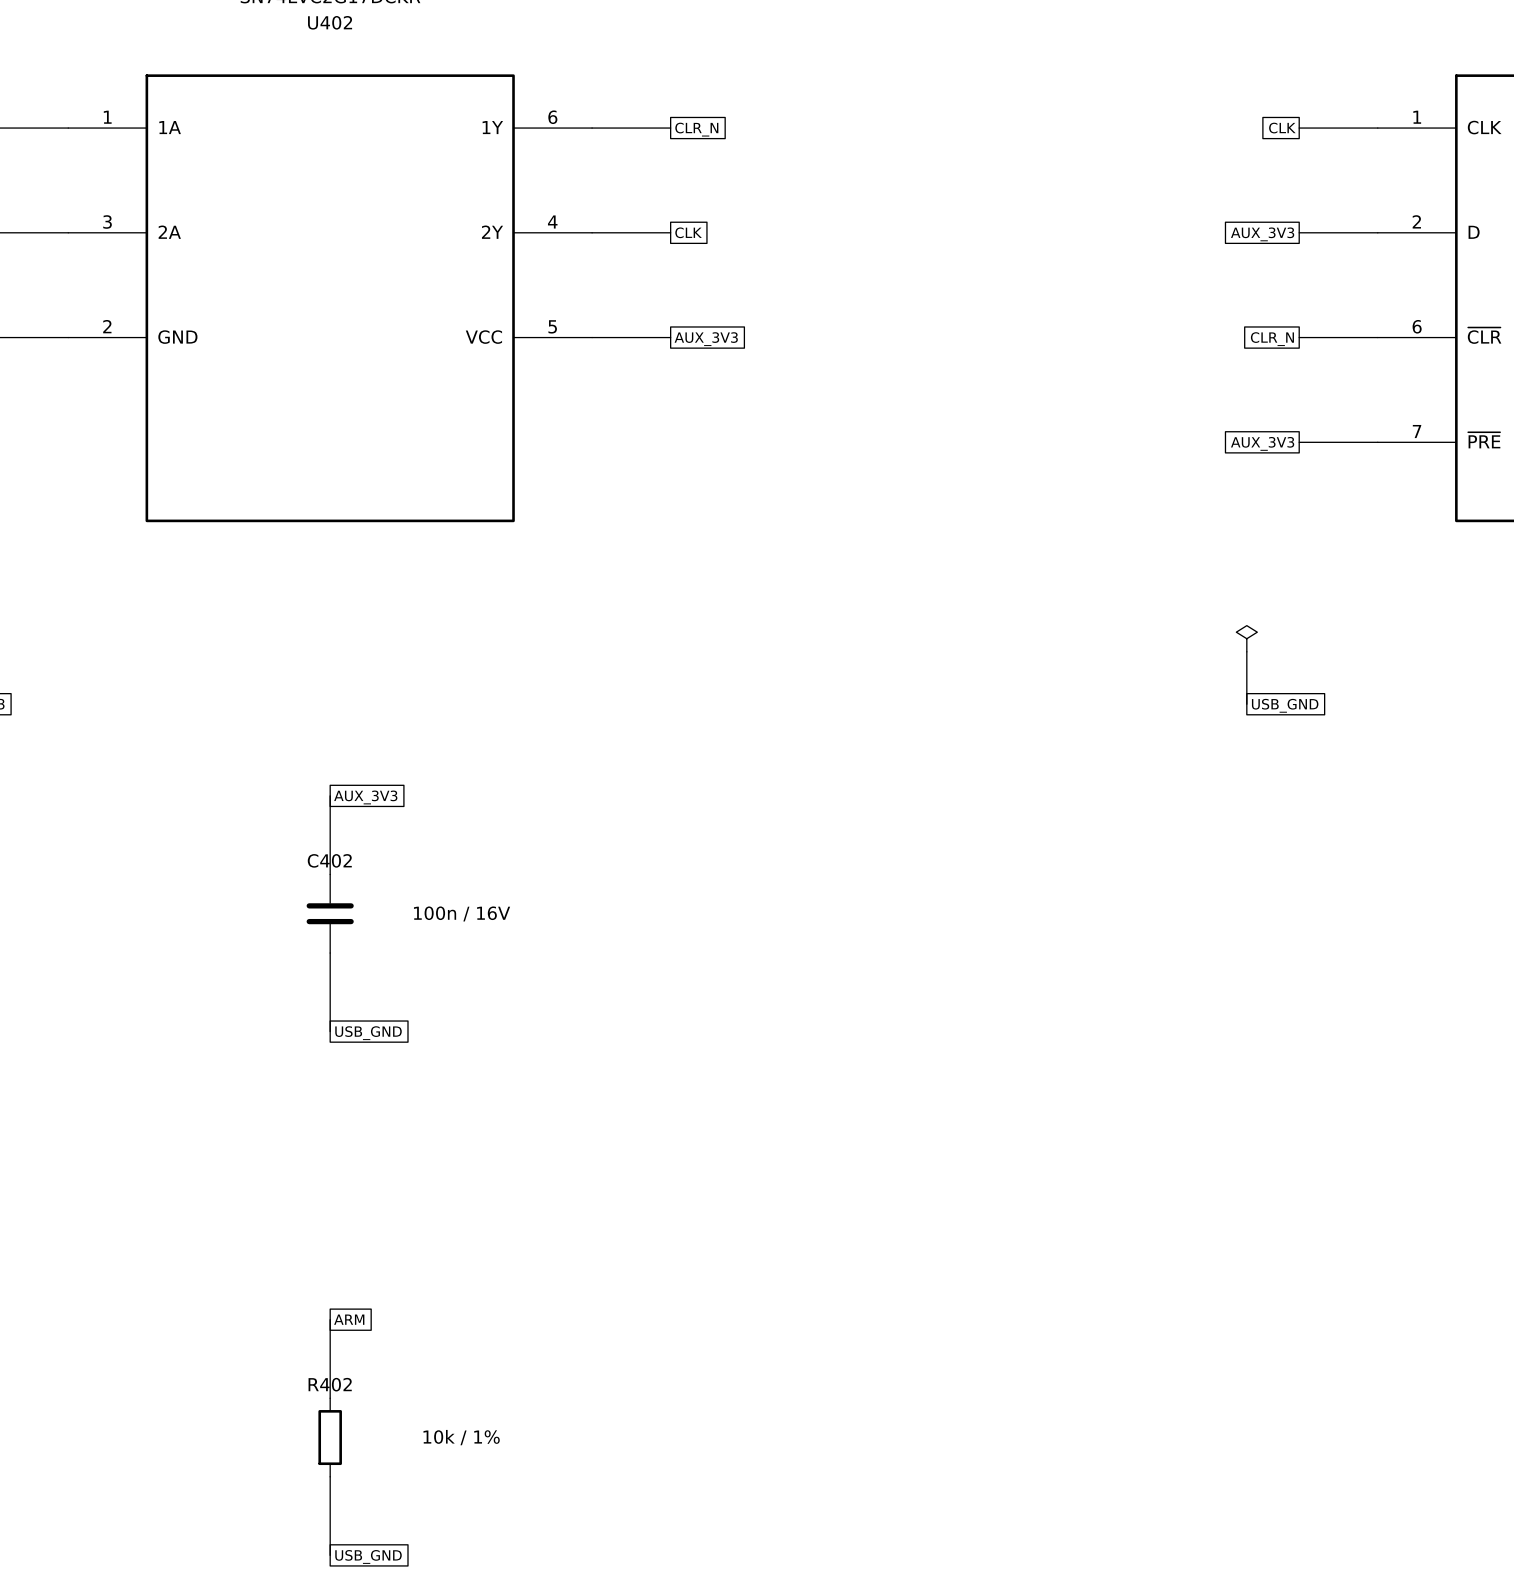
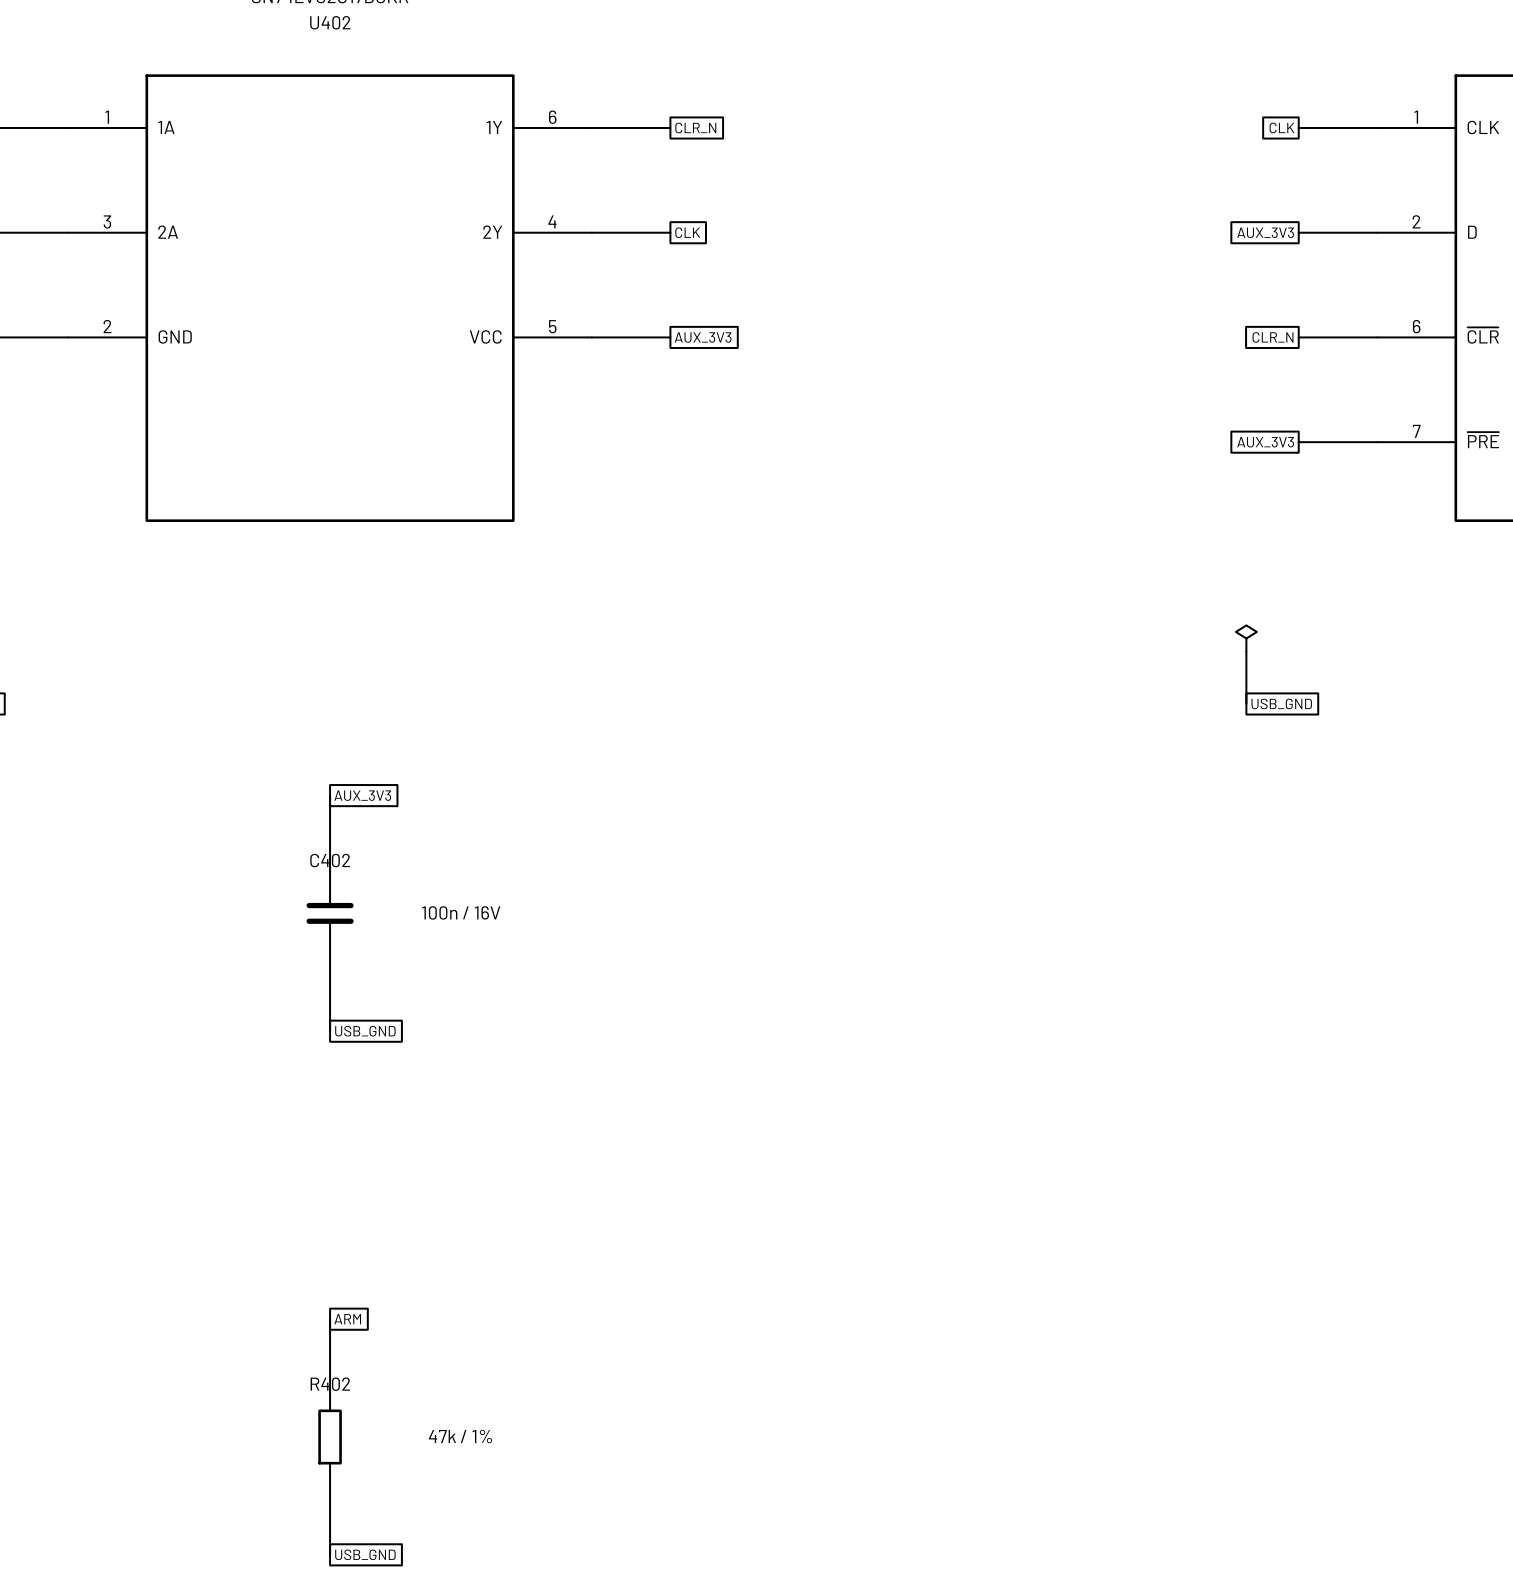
R402 value: 10k / 1% (461, 1437) -> 47k / 1% (460, 1436)

